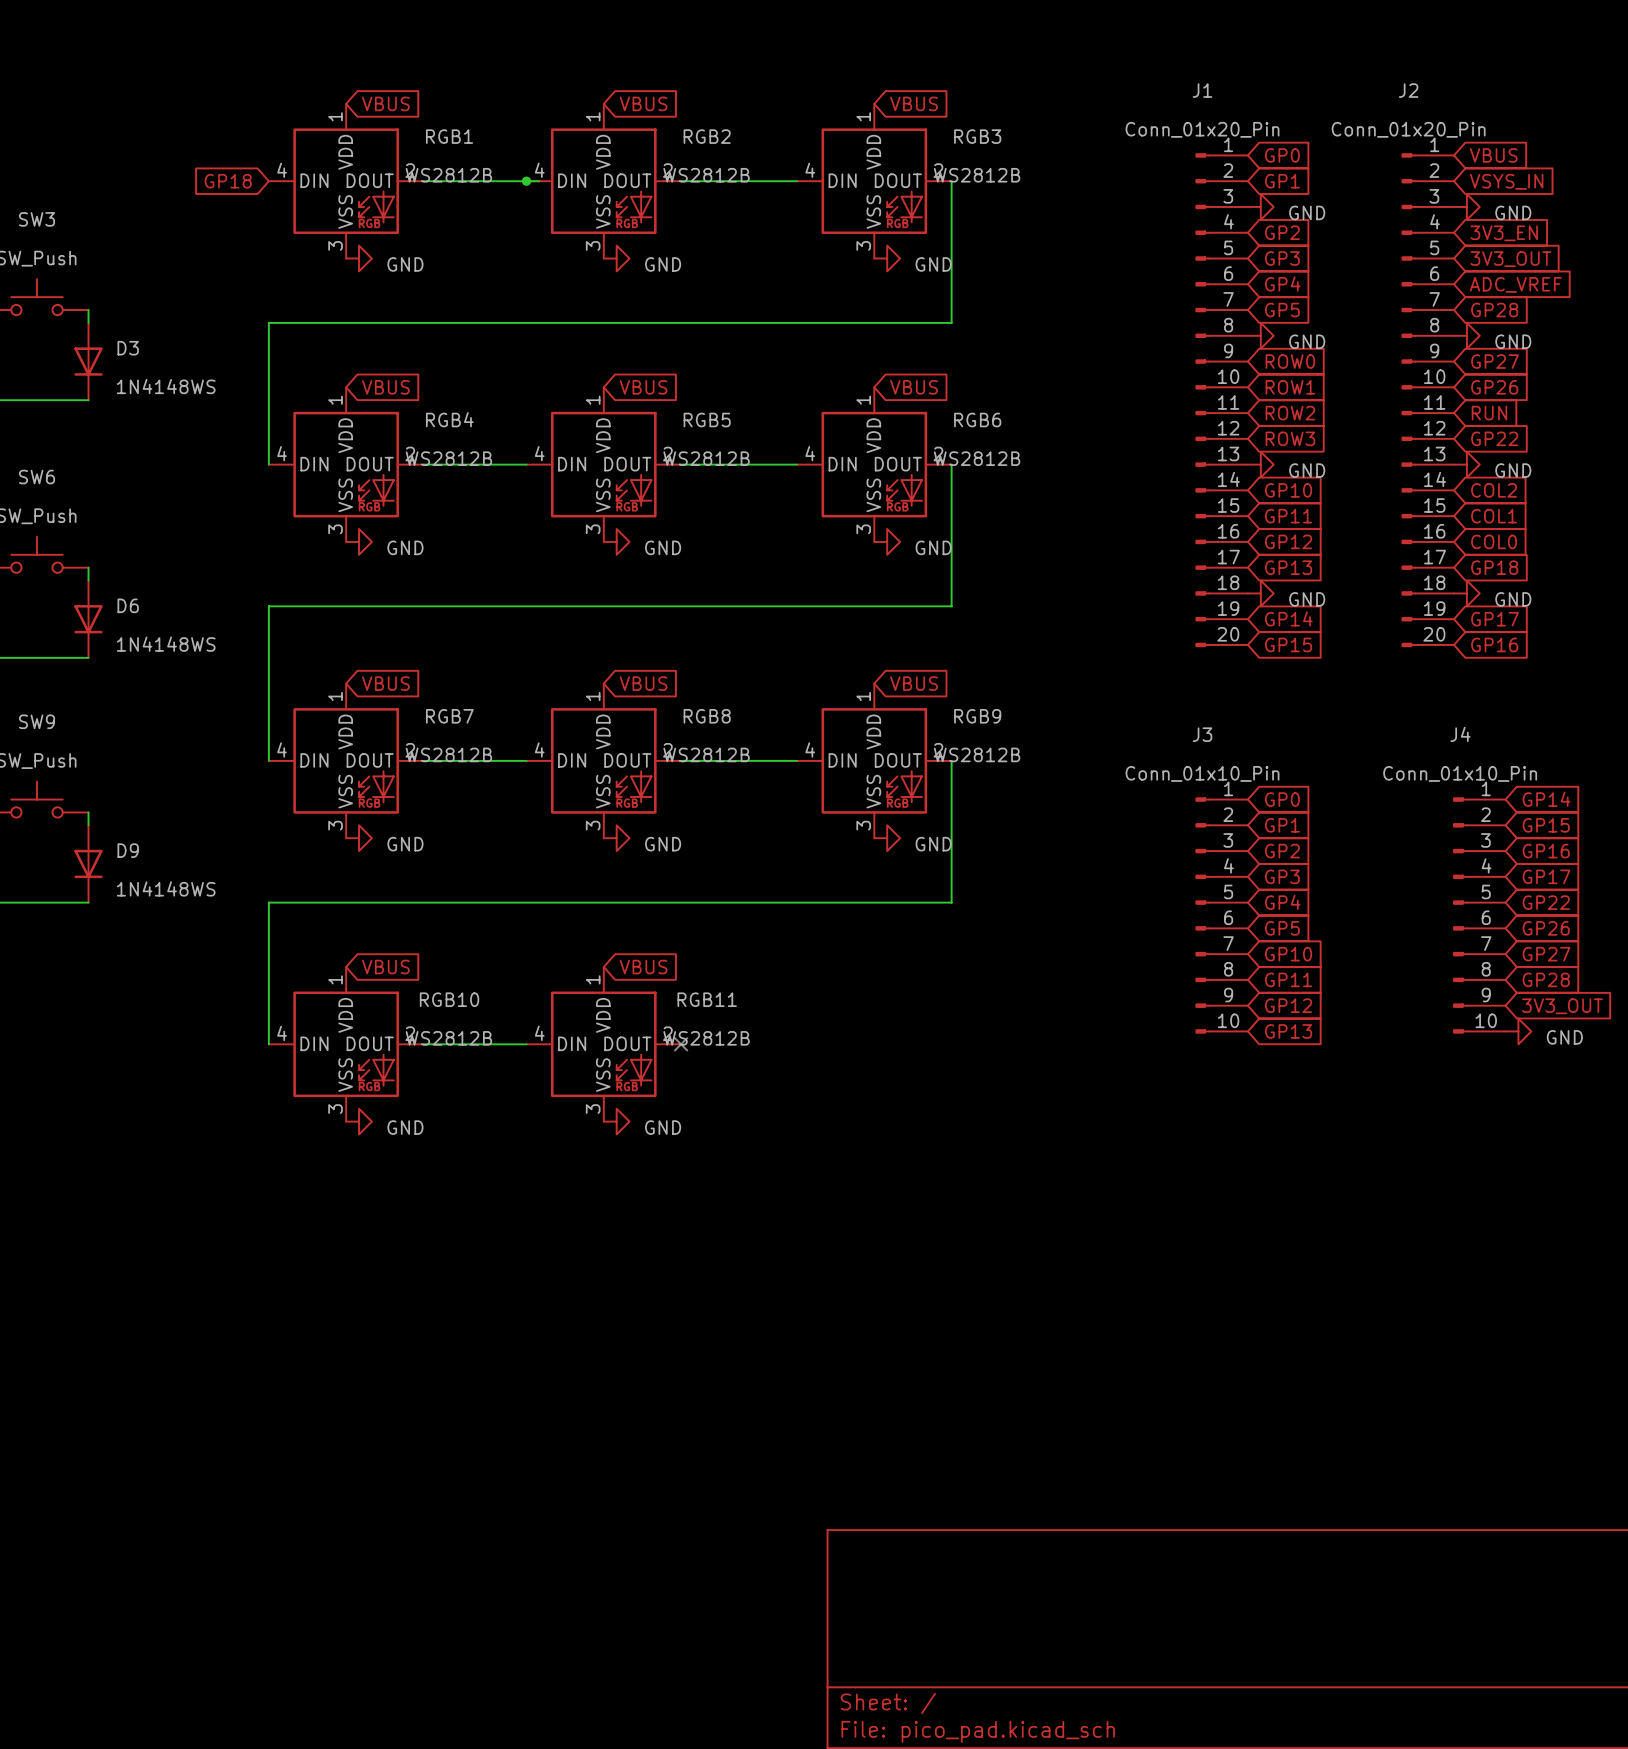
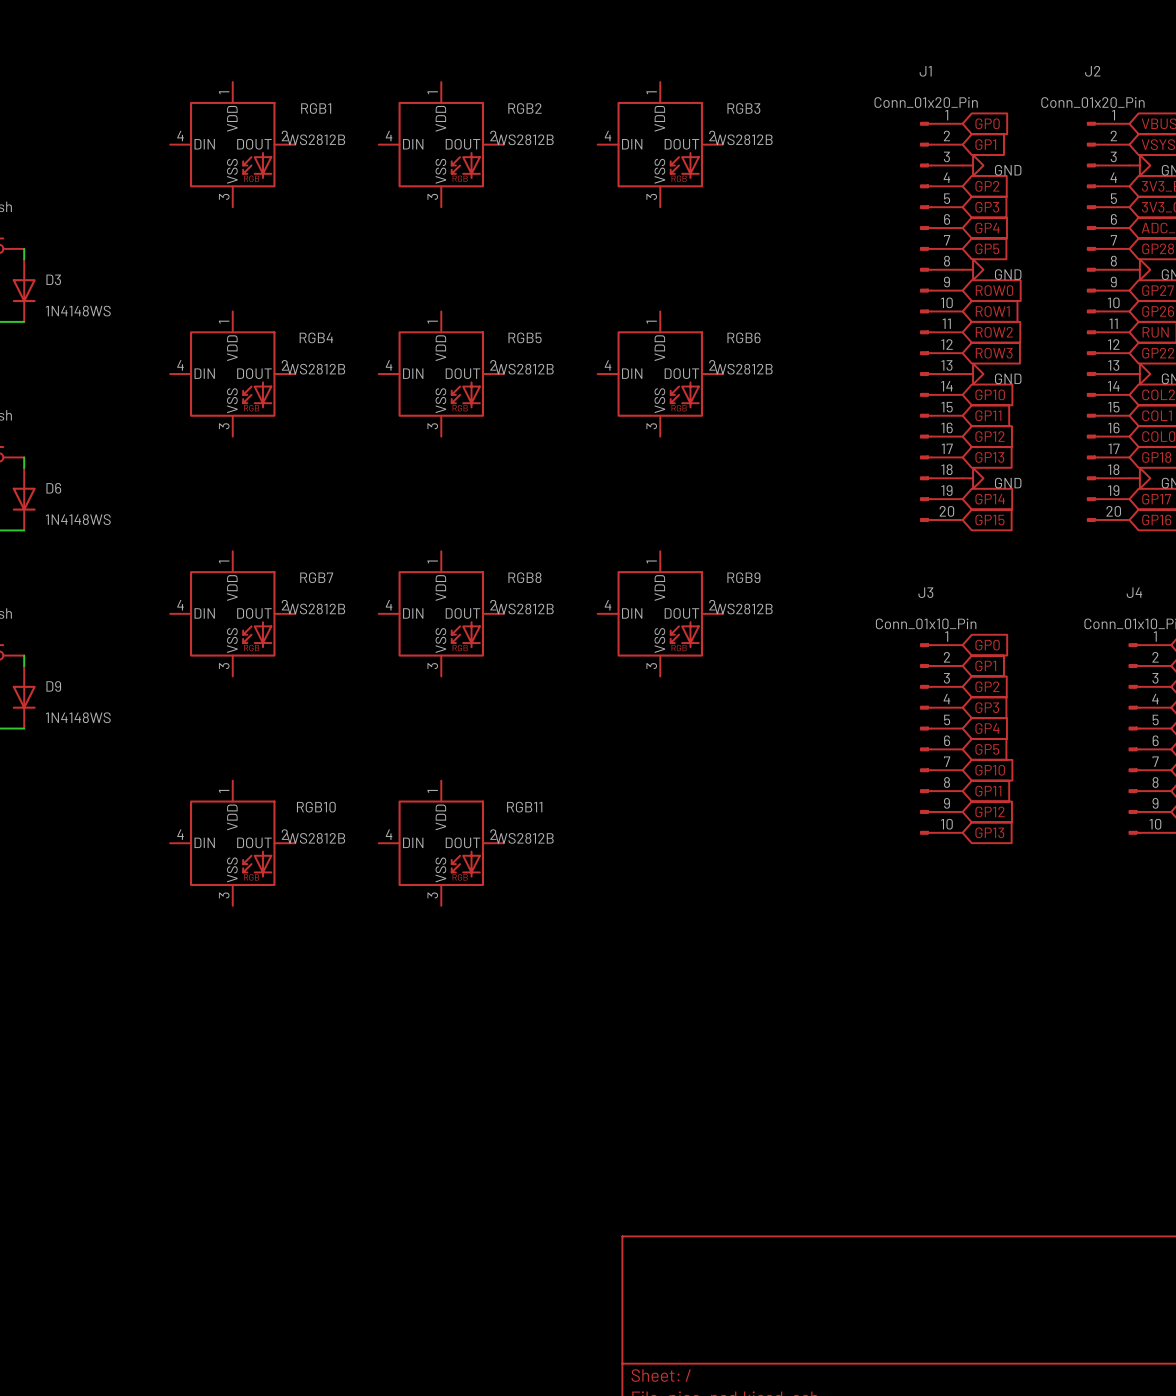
global label: VBUS (385, 103) -> none
global label: VBUS (643, 103) -> none
global label: VBUS (914, 103) -> none
global label: GP18 (228, 181) -> none
wire: (423, 181) (539, 181) -> none
junction: (526, 181) -> none
wire: (681, 181) (797, 181) -> none
wire: (951, 181) (951, 322) (268, 322) (268, 464) -> none
power symbol: GND (359, 258) -> none
power symbol: GND (616, 258) -> none
power symbol: GND (887, 258) -> none
global label: VBUS (385, 387) -> none
global label: VBUS (643, 387) -> none
global label: VBUS (914, 387) -> none
wire: (423, 464) (526, 464) -> none
wire: (681, 464) (797, 464) -> none
wire: (951, 464) (951, 606) (268, 606) (268, 760) -> none
power symbol: GND (359, 541) -> none
power symbol: GND (616, 541) -> none
power symbol: GND (887, 541) -> none
global label: VBUS (385, 683) -> none
global label: VBUS (643, 683) -> none
global label: VBUS (914, 683) -> none
wire: (423, 760) (526, 760) -> none
wire: (681, 760) (797, 760) -> none
wire: (951, 760) (951, 902) (268, 902) (268, 1044) -> none
power symbol: GND (359, 838) -> none
power symbol: GND (616, 838) -> none
power symbol: GND (887, 838) -> none
global label: VBUS (385, 967) -> none
global label: VBUS (643, 967) -> none
wire: (423, 1044) (526, 1044) -> none
no-connect mark: (681, 1044) -> none
power symbol: GND (359, 1121) -> none
power symbol: GND (616, 1121) -> none

